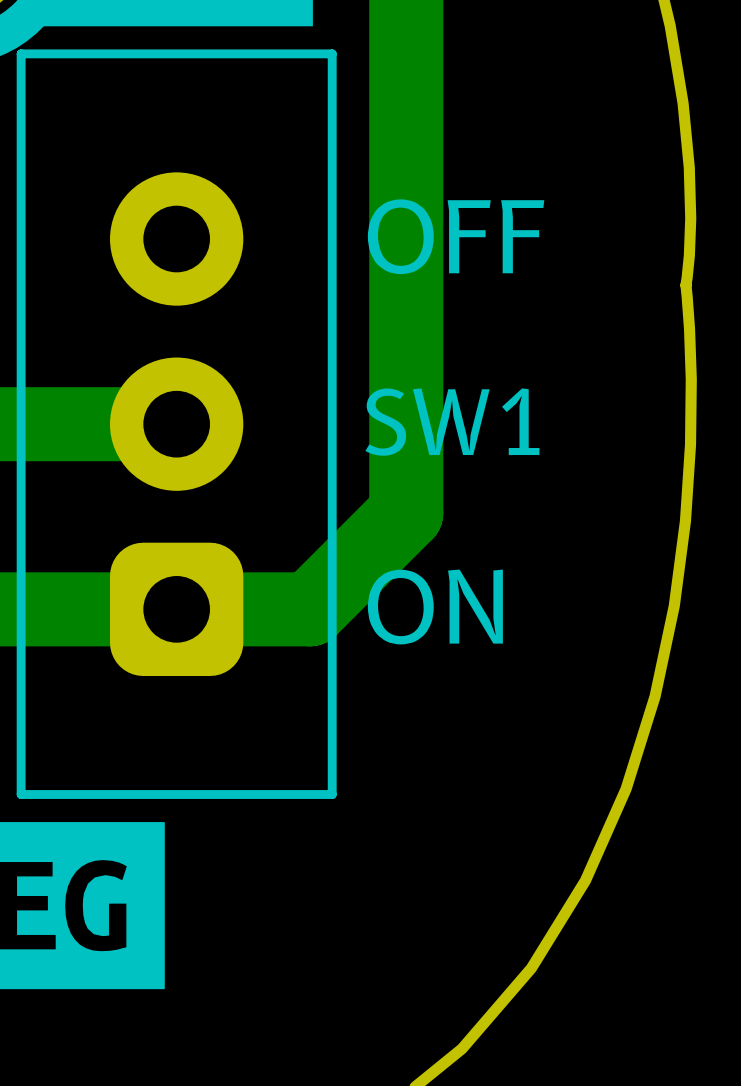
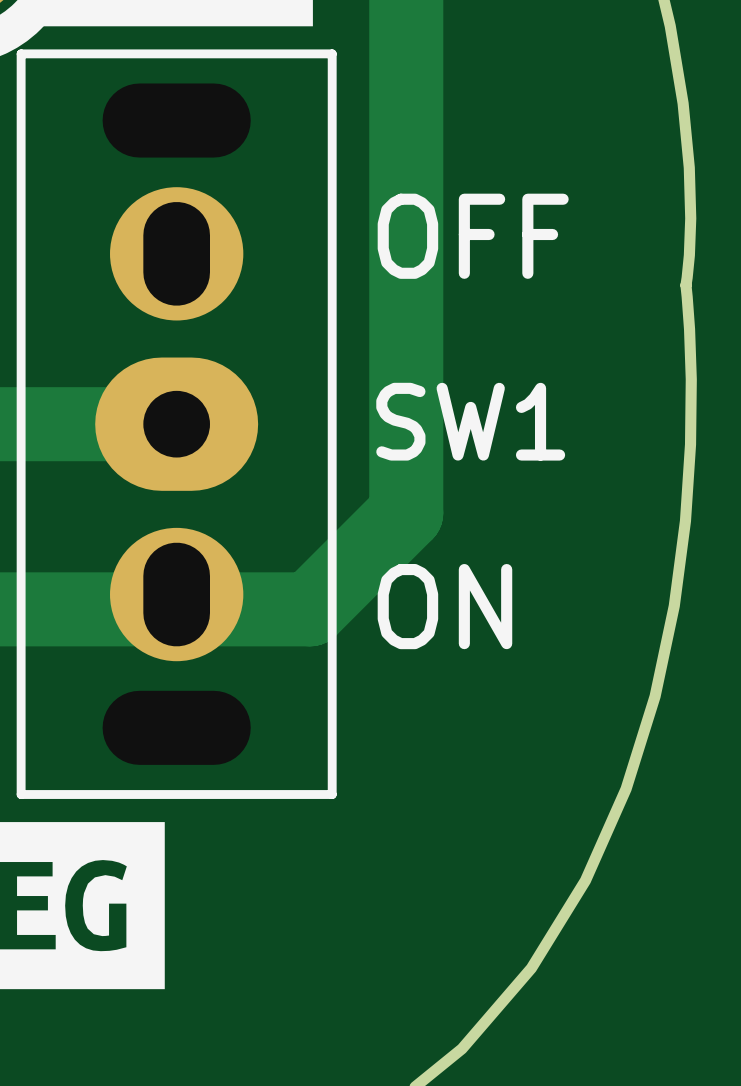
SW1 footprint: [16, 49, 337, 799] -> [16, 49, 337, 799]

